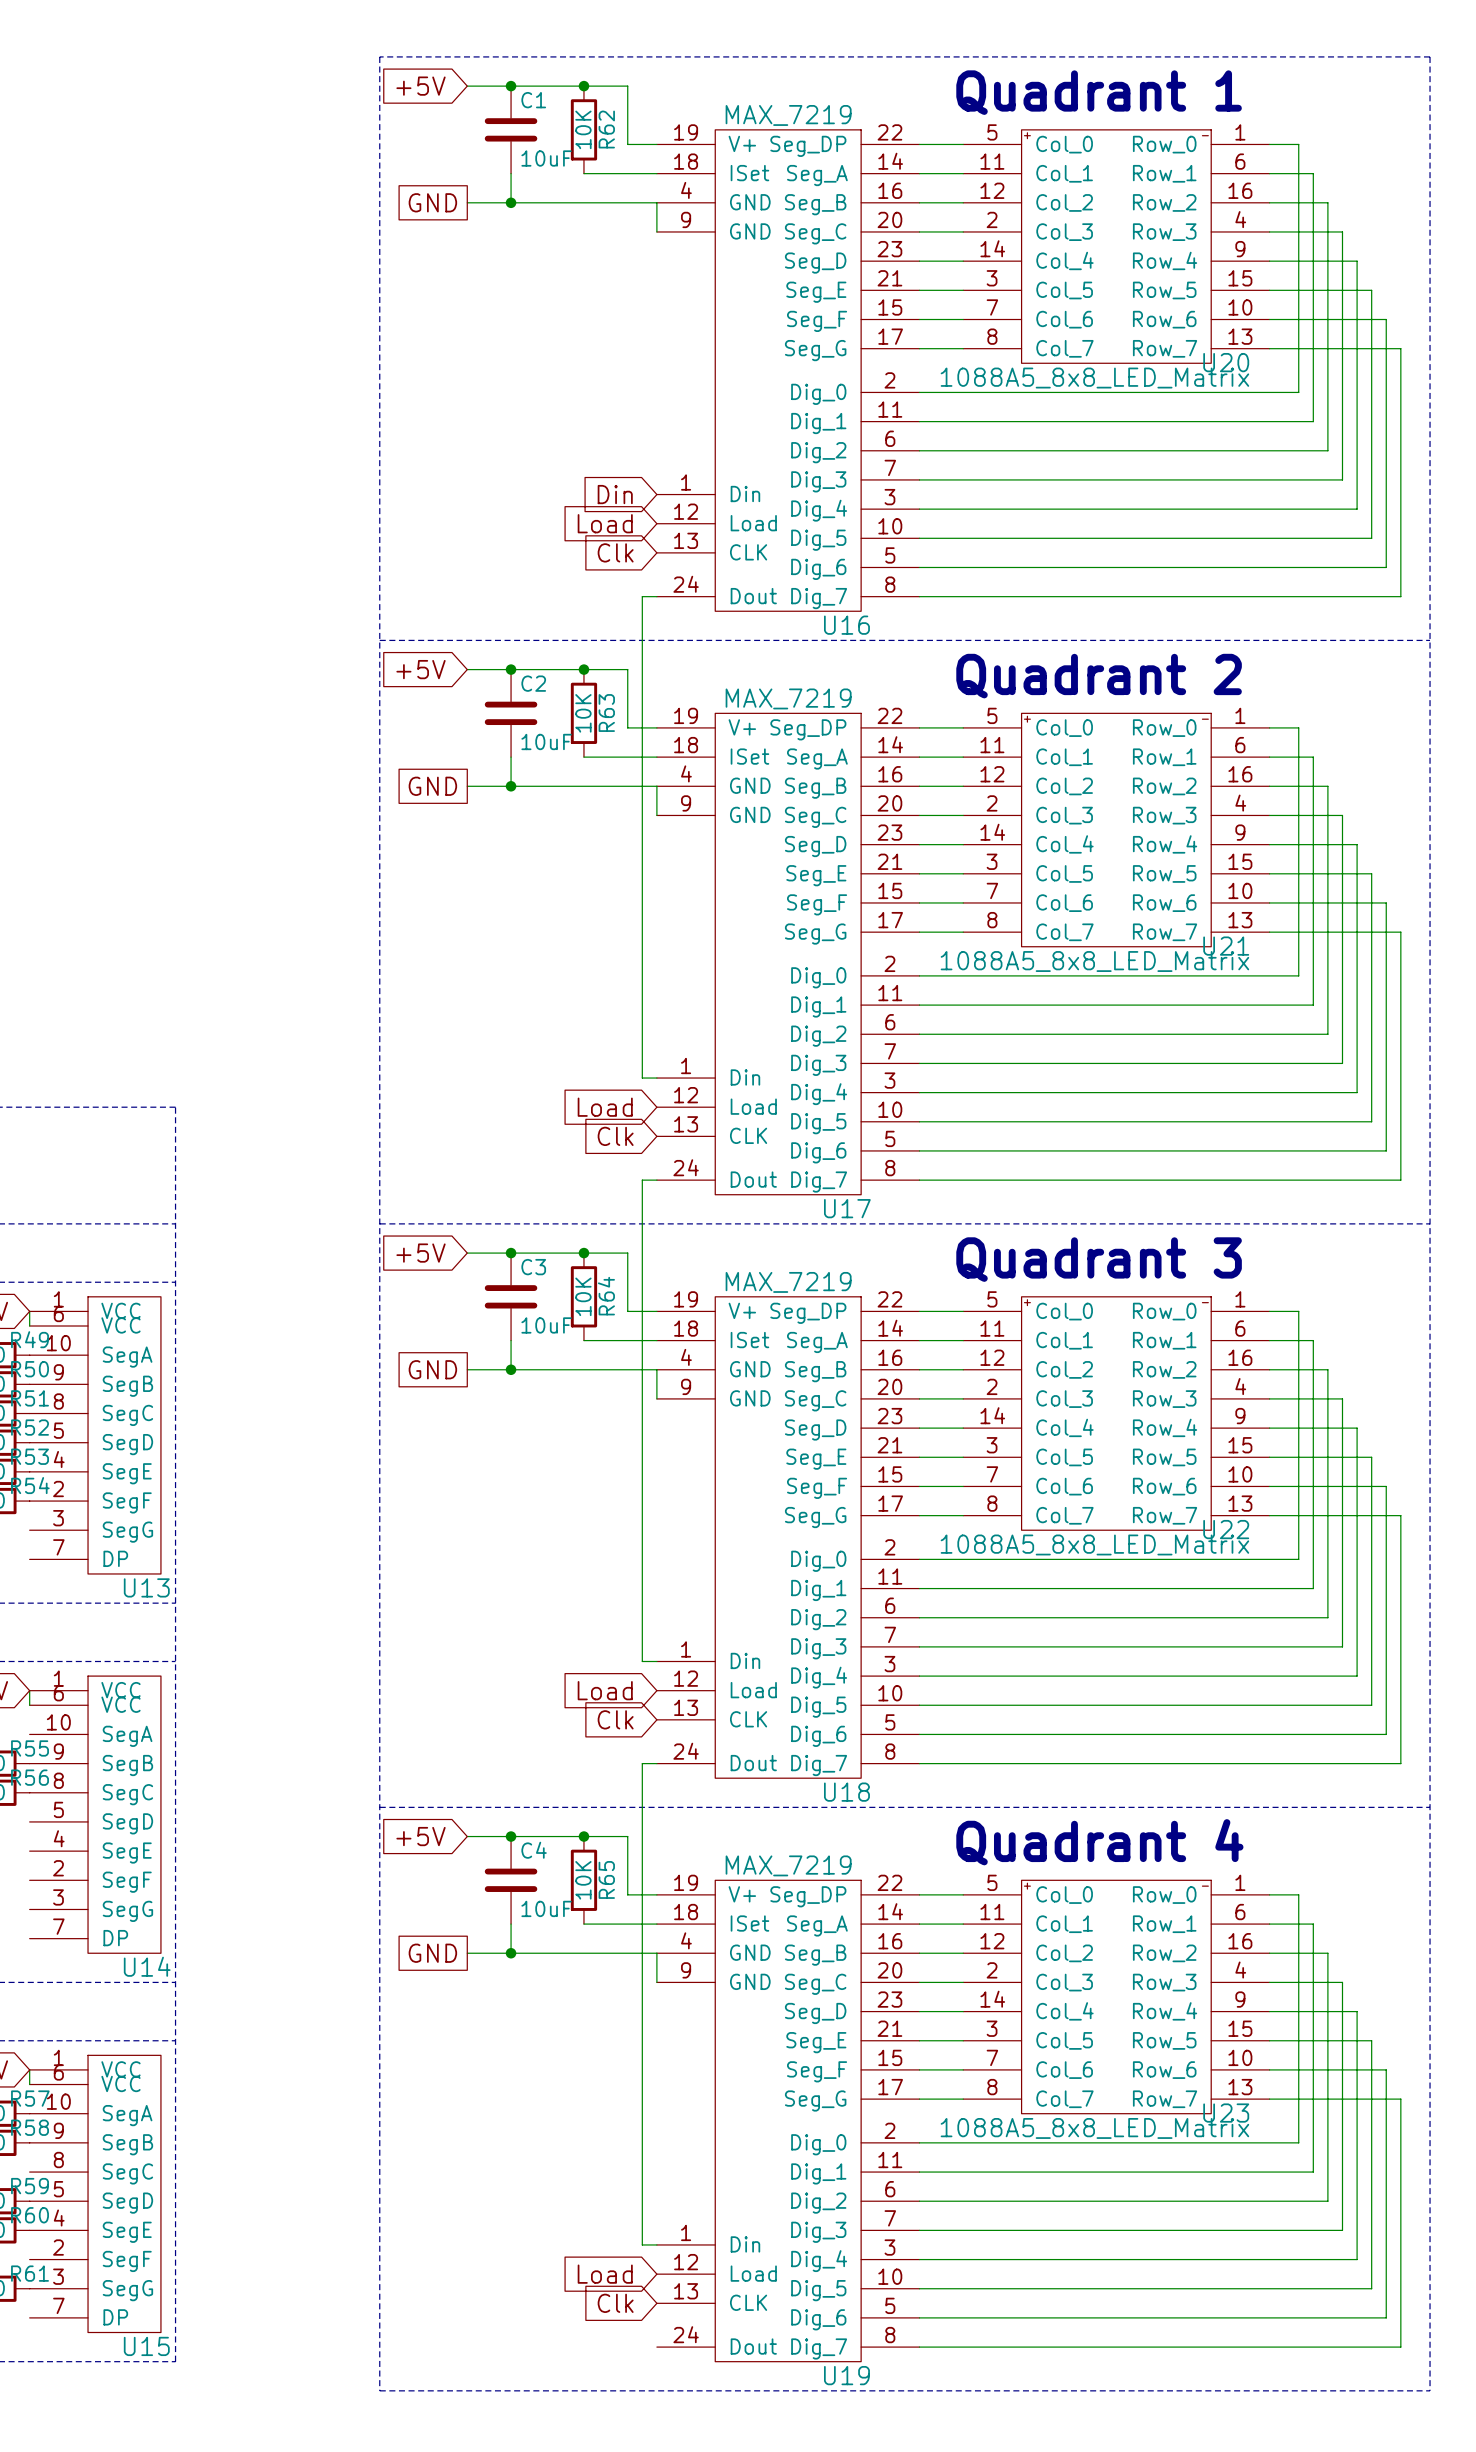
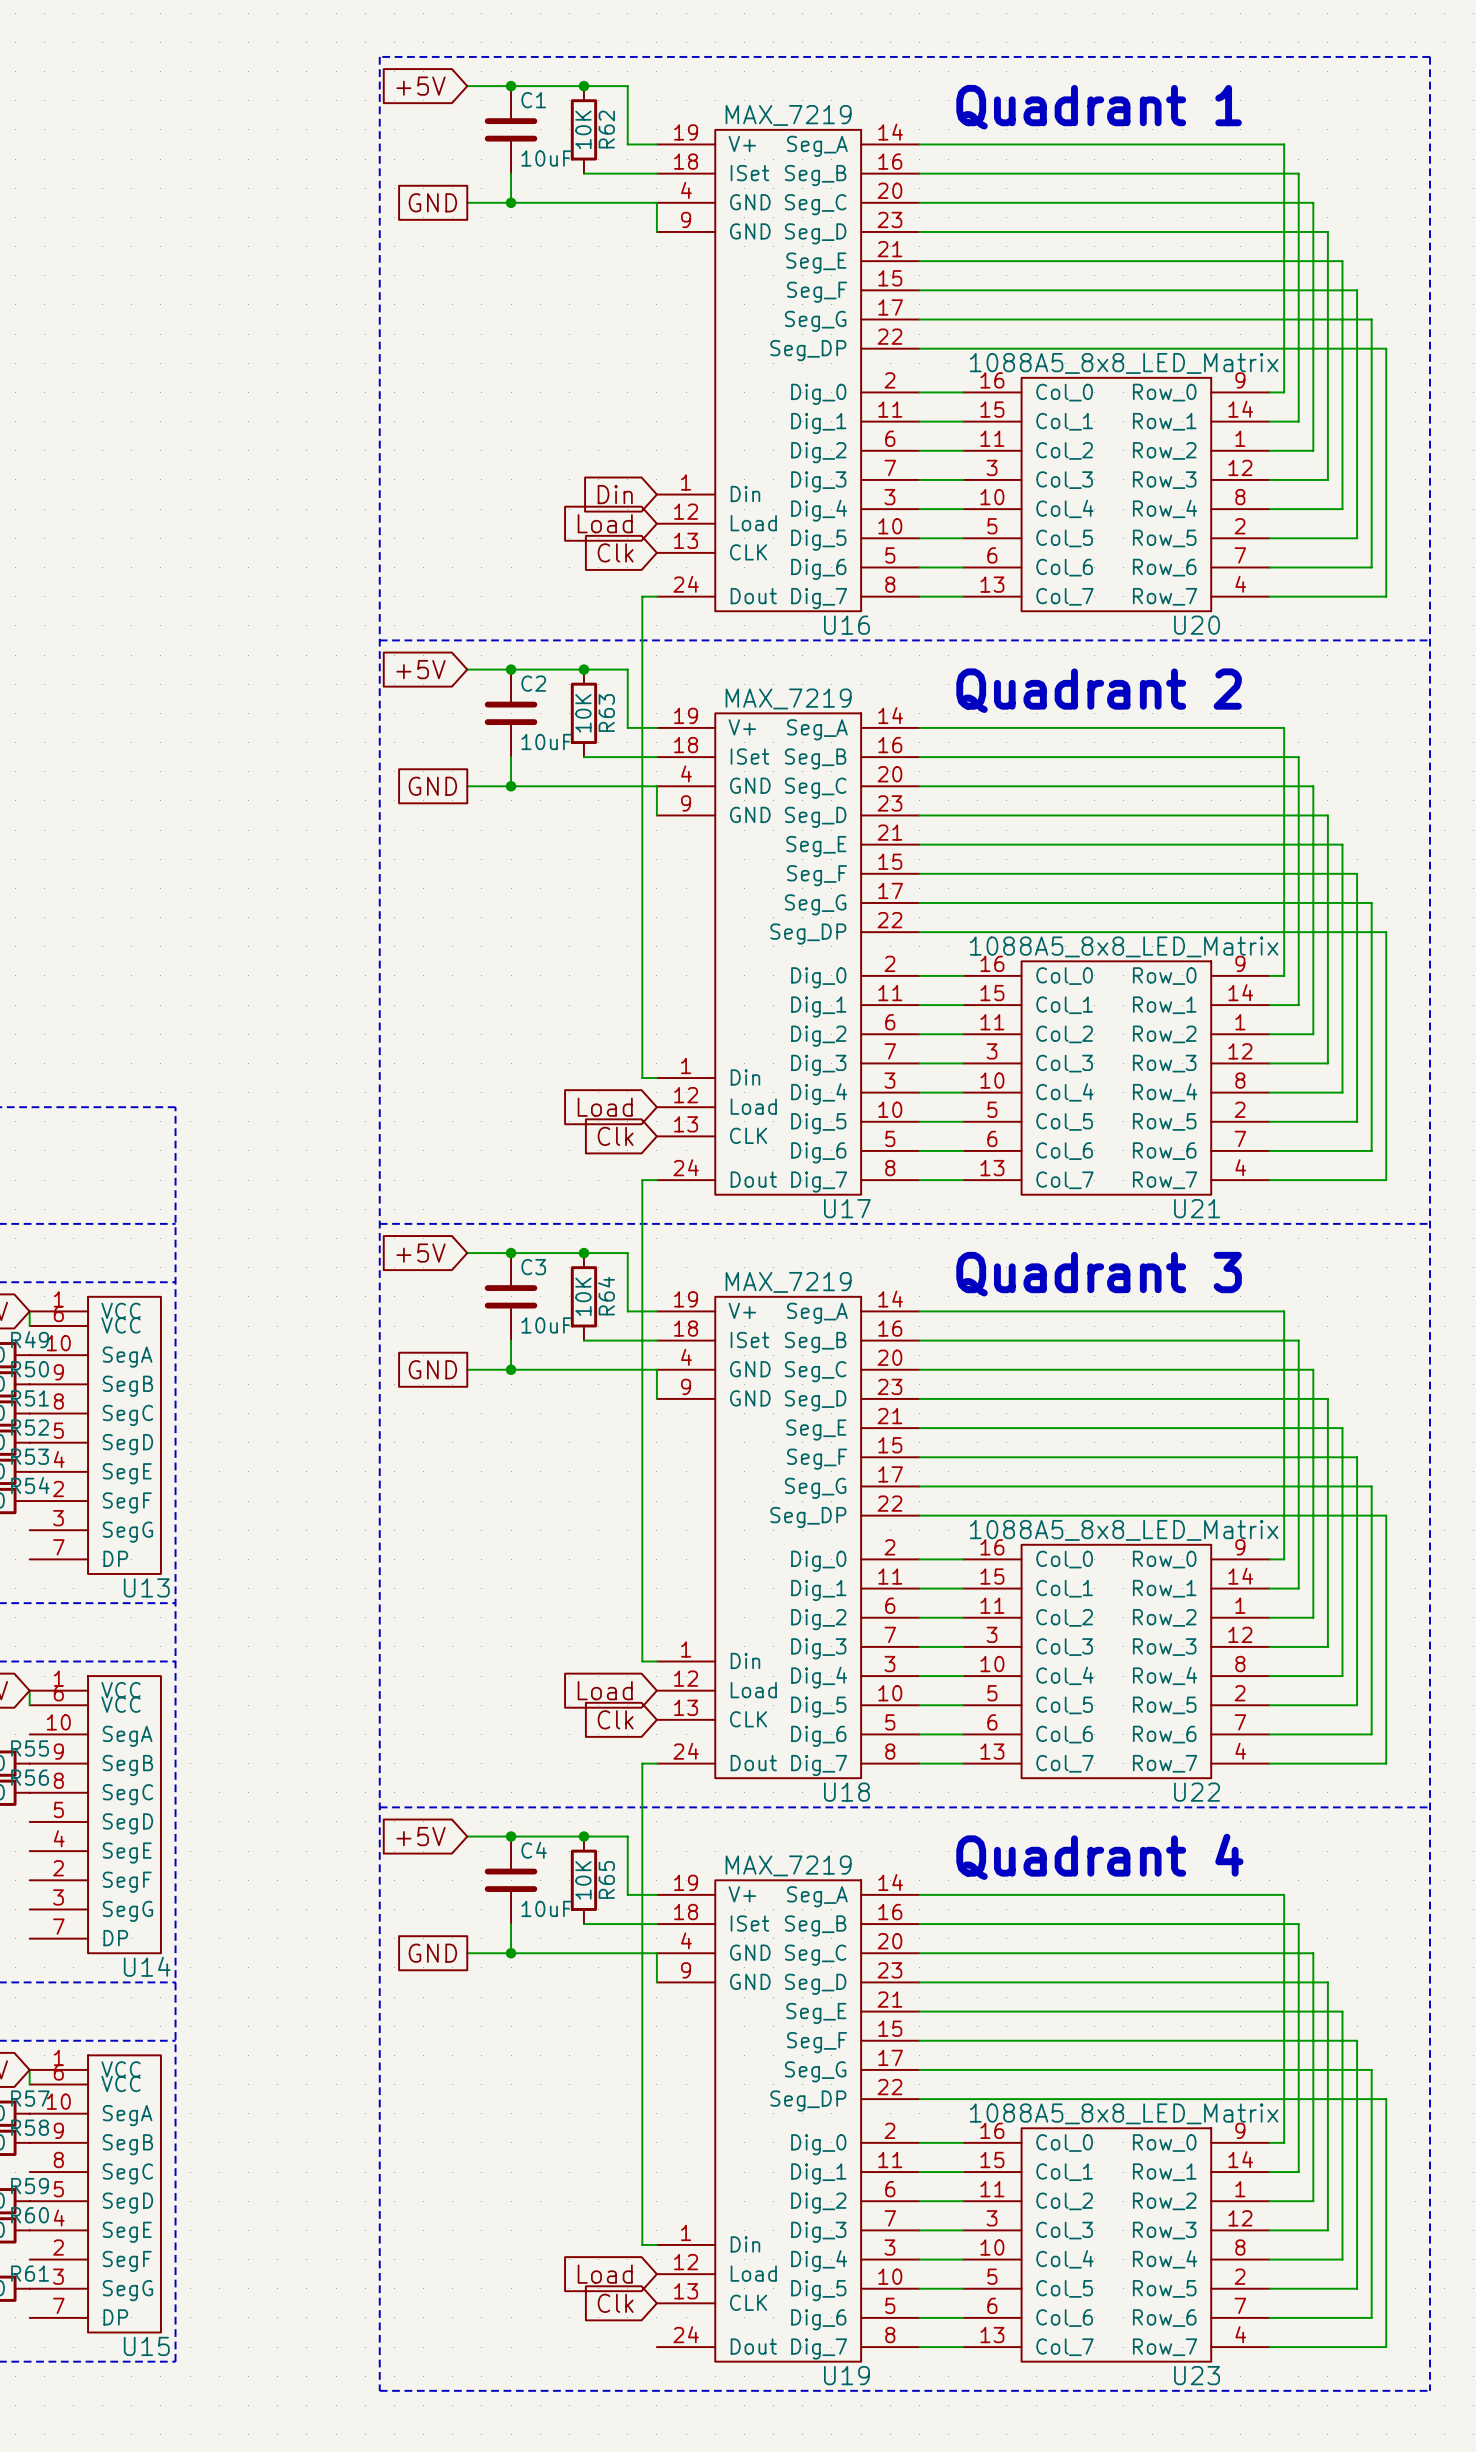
text position: Quadrant 1 (1099, 92) -> Quadrant 1 (1099, 107)
U16 symbol: [656, 129, 920, 612] -> [656, 129, 920, 612]
U20 symbol: [963, 129, 1270, 364] -> [963, 377, 1270, 612]
wire: (1284, 144) (1298, 144) (1298, 173) (1313, 173) (1313, 202) (1327, 202) (1327, 231) (1342, 231) (1342, 261) (1357, 261) (1357, 290) (1371, 290) (1371, 319) (1386, 319) (1386, 348) (1400, 348) (1400, 596) (1386, 596) -> (1284, 144) (1284, 392)
U20 name position: U20 (1226, 362) -> U20 (1197, 625)
U20 value position: 1088A5_8x8_LED_Matrix (1094, 378) -> 1088A5_8x8_LED_Matrix (1124, 363)
wire: (963, 392) (1269, 392) -> (963, 144) (1269, 144)
wire: (1284, 392) (1298, 392) -> (1298, 421) (1298, 392)
wire: (963, 421) (1269, 421) -> (963, 173) (1269, 173)
wire: (1298, 421) (1313, 421) -> (1313, 450) (1313, 421)
wire: (963, 450) (1269, 450) -> (963, 202) (1269, 202)
wire: (1313, 450) (1327, 450) -> none
wire: (963, 479) (1269, 479) -> (963, 231) (1269, 231)
wire: (1327, 479) (1342, 479) -> (1327, 479) (1327, 450)
wire: (963, 509) (1269, 509) -> (963, 261) (1269, 261)
wire: (1342, 509) (1357, 509) -> (1342, 509) (1342, 479)
wire: (963, 538) (1269, 538) -> (963, 290) (1269, 290)
wire: (1357, 538) (1371, 538) -> (1357, 538) (1357, 509)
wire: (963, 567) (1269, 567) -> (963, 319) (1269, 319)
wire: (1371, 567) (1386, 567) -> (1371, 567) (1371, 538)
wire: none -> (1386, 567) (1386, 596)
wire: (963, 596) (1269, 596) -> (963, 348) (1269, 348)
text position: Quadrant 2 (1099, 676) -> Quadrant 2 (1099, 690)
U17 symbol: [656, 713, 920, 1195] -> [656, 713, 920, 1195]
U21 symbol: [963, 713, 1270, 947] -> [963, 961, 1270, 1195]
wire: (1284, 727) (1298, 727) (1298, 757) (1313, 757) (1313, 786) (1327, 786) (1327, 815) (1342, 815) (1342, 844) (1357, 844) (1357, 873) (1371, 873) (1371, 902) (1386, 902) (1386, 932) (1400, 932) (1400, 1180) (1386, 1180) -> (1284, 727) (1284, 975)
U21 name position: U21 (1226, 946) -> U21 (1197, 1208)
U21 value position: 1088A5_8x8_LED_Matrix (1094, 961) -> 1088A5_8x8_LED_Matrix (1124, 946)
wire: (963, 975) (1269, 975) -> (963, 727) (1269, 727)
wire: (1284, 975) (1298, 975) -> (1298, 1005) (1298, 975)
wire: (963, 1005) (1269, 1005) -> (963, 757) (1269, 757)
wire: (1298, 1005) (1313, 1005) -> (1313, 1034) (1313, 1005)
wire: (963, 1034) (1269, 1034) -> (963, 786) (1269, 786)
wire: (1313, 1034) (1327, 1034) -> (1327, 1063) (1327, 1034)
wire: (963, 1063) (1269, 1063) -> (963, 815) (1269, 815)
wire: (1327, 1063) (1342, 1063) -> (1342, 1092) (1342, 1063)
wire: (963, 1092) (1269, 1092) -> (963, 844) (1269, 844)
wire: (1342, 1092) (1357, 1092) -> (1357, 1121) (1357, 1092)
wire: (963, 1121) (1269, 1121) -> (963, 873) (1269, 873)
wire: (1357, 1121) (1371, 1121) -> none
wire: (963, 1150) (1269, 1150) -> (963, 902) (1269, 902)
wire: (1371, 1150) (1386, 1150) -> (1371, 1150) (1371, 1121)
wire: none -> (1386, 1150) (1386, 1180)
wire: (963, 1180) (1269, 1180) -> (963, 932) (1269, 932)
text position: Quadrant 3 (1099, 1259) -> Quadrant 3 (1099, 1274)
U18 symbol: [656, 1296, 920, 1779] -> [656, 1296, 920, 1779]
U22 symbol: [963, 1296, 1270, 1531] -> [963, 1544, 1270, 1779]
wire: (1284, 1311) (1298, 1311) (1298, 1340) (1313, 1340) (1313, 1369) (1327, 1369) (1327, 1398) (1342, 1398) (1342, 1428) (1357, 1428) (1357, 1457) (1371, 1457) (1371, 1486) (1386, 1486) (1386, 1515) (1400, 1515) (1400, 1763) (1386, 1763) -> (1284, 1311) (1284, 1559)
U22 name position: U22 (1226, 1529) -> U22 (1197, 1792)
U22 value position: 1088A5_8x8_LED_Matrix (1094, 1544) -> 1088A5_8x8_LED_Matrix (1124, 1530)
wire: (963, 1559) (1269, 1559) -> (963, 1311) (1269, 1311)
wire: (1284, 1559) (1298, 1559) -> (1298, 1588) (1298, 1559)
wire: (963, 1588) (1269, 1588) -> (963, 1340) (1269, 1340)
wire: (1298, 1588) (1313, 1588) -> (1313, 1617) (1313, 1588)
wire: (963, 1617) (1269, 1617) -> (963, 1369) (1269, 1369)
wire: (1313, 1617) (1327, 1617) -> none
wire: (963, 1646) (1269, 1646) -> (963, 1398) (1269, 1398)
wire: (1327, 1646) (1342, 1646) -> (1327, 1646) (1327, 1617)
wire: none -> (1342, 1646) (1342, 1676)
wire: (963, 1676) (1269, 1676) -> (963, 1428) (1269, 1428)
wire: (1342, 1676) (1357, 1676) -> (1357, 1705) (1357, 1676)
wire: (963, 1705) (1269, 1705) -> (963, 1457) (1269, 1457)
wire: (1357, 1705) (1371, 1705) -> none
wire: (963, 1734) (1269, 1734) -> (963, 1486) (1269, 1486)
wire: (1371, 1734) (1386, 1734) -> (1371, 1734) (1371, 1705)
wire: none -> (1386, 1734) (1386, 1763)
wire: (963, 1763) (1269, 1763) -> (963, 1515) (1269, 1515)
text position: Quadrant 4 (1099, 1842) -> Quadrant 4 (1099, 1856)
U19 symbol: [656, 1880, 920, 2362] -> [656, 1880, 920, 2362]
U23 symbol: [963, 1880, 1270, 2114] -> [963, 2128, 1270, 2362]
wire: (1284, 1894) (1298, 1894) (1298, 1924) (1313, 1924) (1313, 1953) (1327, 1953) (1327, 1982) (1342, 1982) (1342, 2011) (1357, 2011) (1357, 2040) (1371, 2040) (1371, 2069) (1386, 2069) (1386, 2099) (1400, 2099) (1400, 2347) (1386, 2347) -> (1284, 1894) (1284, 2142)
U23 name position: U23 (1226, 2113) -> U23 (1197, 2375)
U23 value position: 1088A5_8x8_LED_Matrix (1094, 2128) -> 1088A5_8x8_LED_Matrix (1124, 2113)
wire: (963, 2142) (1269, 2142) -> (963, 1894) (1269, 1894)
wire: (1284, 2142) (1298, 2142) -> (1298, 2172) (1298, 2142)
wire: (963, 2172) (1269, 2172) -> (963, 1924) (1269, 1924)
wire: (1298, 2172) (1313, 2172) -> (1313, 2201) (1313, 2172)
wire: (963, 2201) (1269, 2201) -> (963, 1953) (1269, 1953)
wire: (1313, 2201) (1327, 2201) -> none
wire: (963, 2230) (1269, 2230) -> (963, 1982) (1269, 1982)
wire: (1327, 2230) (1342, 2230) -> (1327, 2230) (1327, 2201)
wire: (963, 2259) (1269, 2259) -> (963, 2011) (1269, 2011)
wire: (1342, 2259) (1357, 2259) -> (1342, 2259) (1342, 2230)
wire: (963, 2288) (1269, 2288) -> (963, 2040) (1269, 2040)
wire: (1357, 2288) (1371, 2288) -> (1357, 2288) (1357, 2259)
wire: (963, 2317) (1269, 2317) -> (963, 2069) (1269, 2069)
wire: (1371, 2317) (1386, 2317) -> (1371, 2317) (1371, 2288)
wire: none -> (1386, 2317) (1386, 2347)
wire: (963, 2347) (1269, 2347) -> (963, 2099) (1269, 2099)

